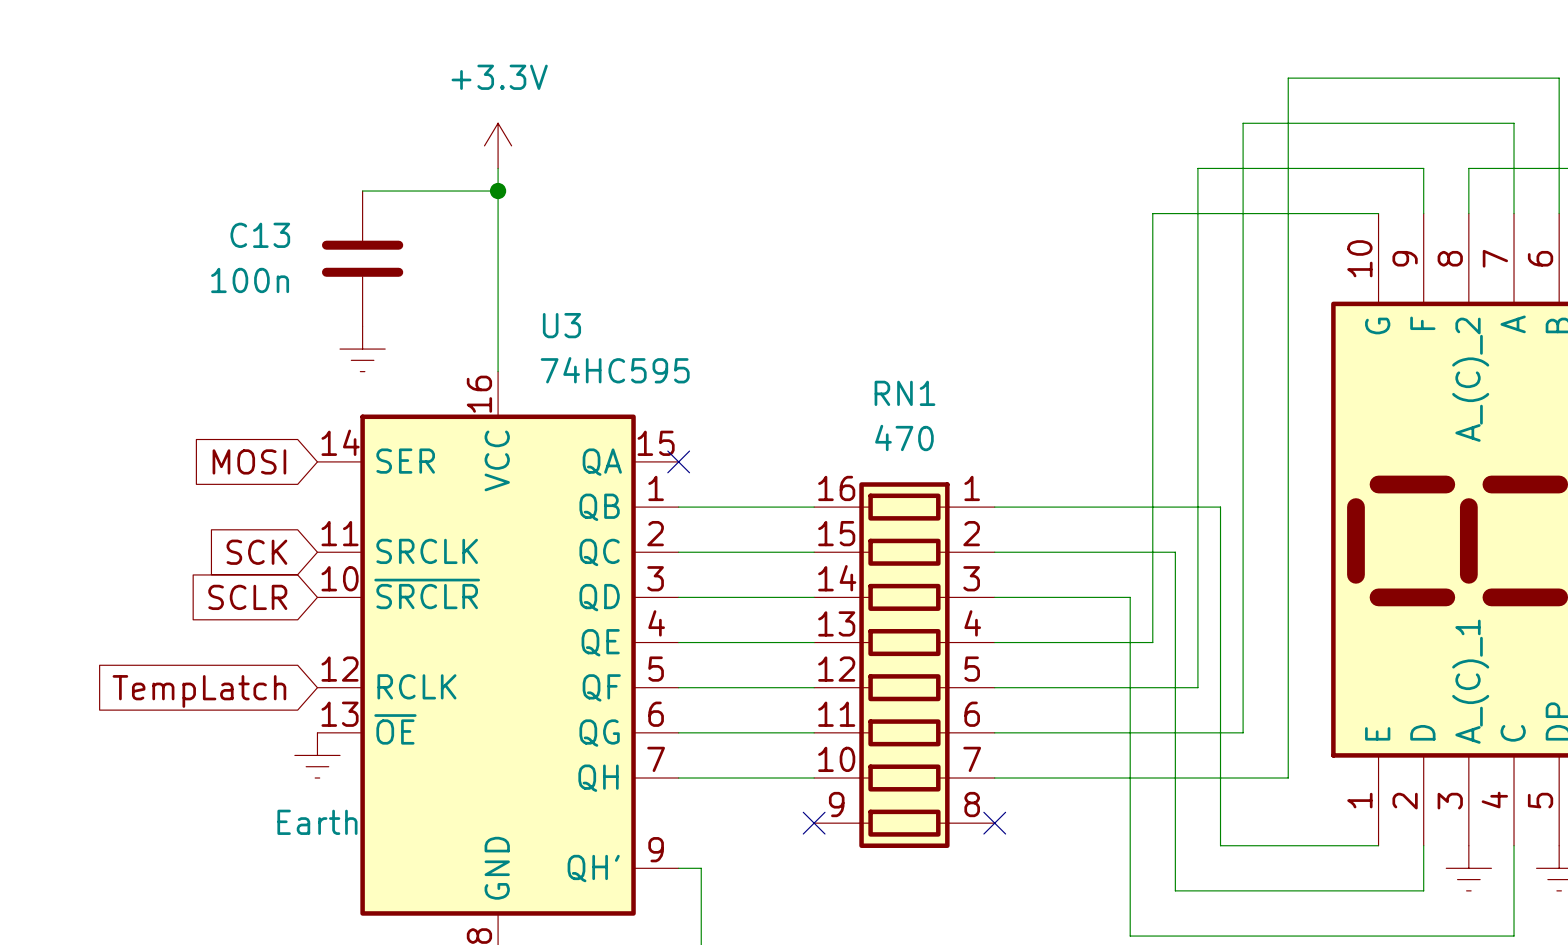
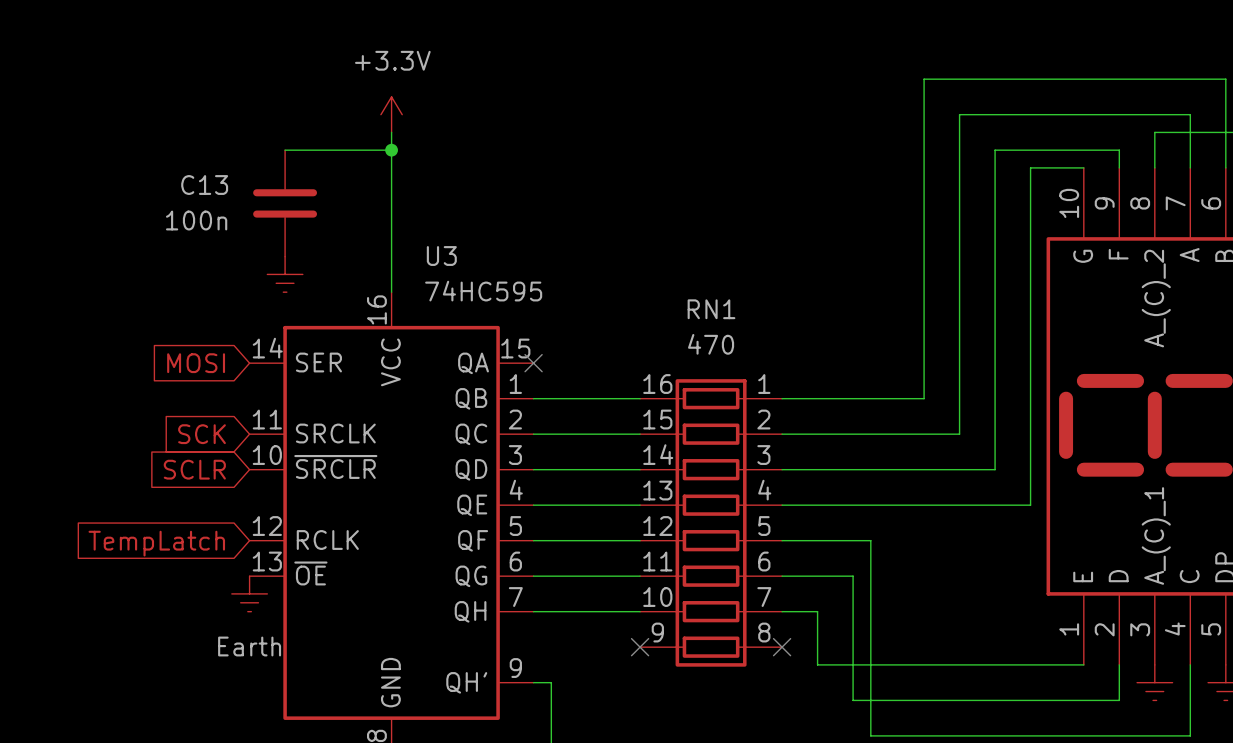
wire: (1559, 100) (1559, 78) (1288, 78) (1288, 778) (1039, 778) -> (1225, 79) (924, 79) (924, 398)
wire: (1514, 145) (1514, 123) (1243, 123) (1243, 732) (1085, 732) -> (1190, 114) (959, 114) (959, 398)
wire: (1423, 191) (1423, 168) (1197, 168) (1197, 687) (1107, 687) -> (1119, 150) (995, 150) (995, 469) (888, 469)
wire: (1310, 213) (1152, 213) (1152, 642) -> (1030, 167) (1030, 505) (906, 505)
wire: (1175, 507) (1220, 507) -> (924, 434) (959, 434)
wire: (1175, 552) (1175, 890) -> (853, 576) (853, 700) (924, 700)
wire: (1220, 552) (1220, 845) -> (817, 611) (817, 664) (959, 664)
wire: (1130, 597) (1130, 936) -> (870, 540) (870, 735) (888, 735)

